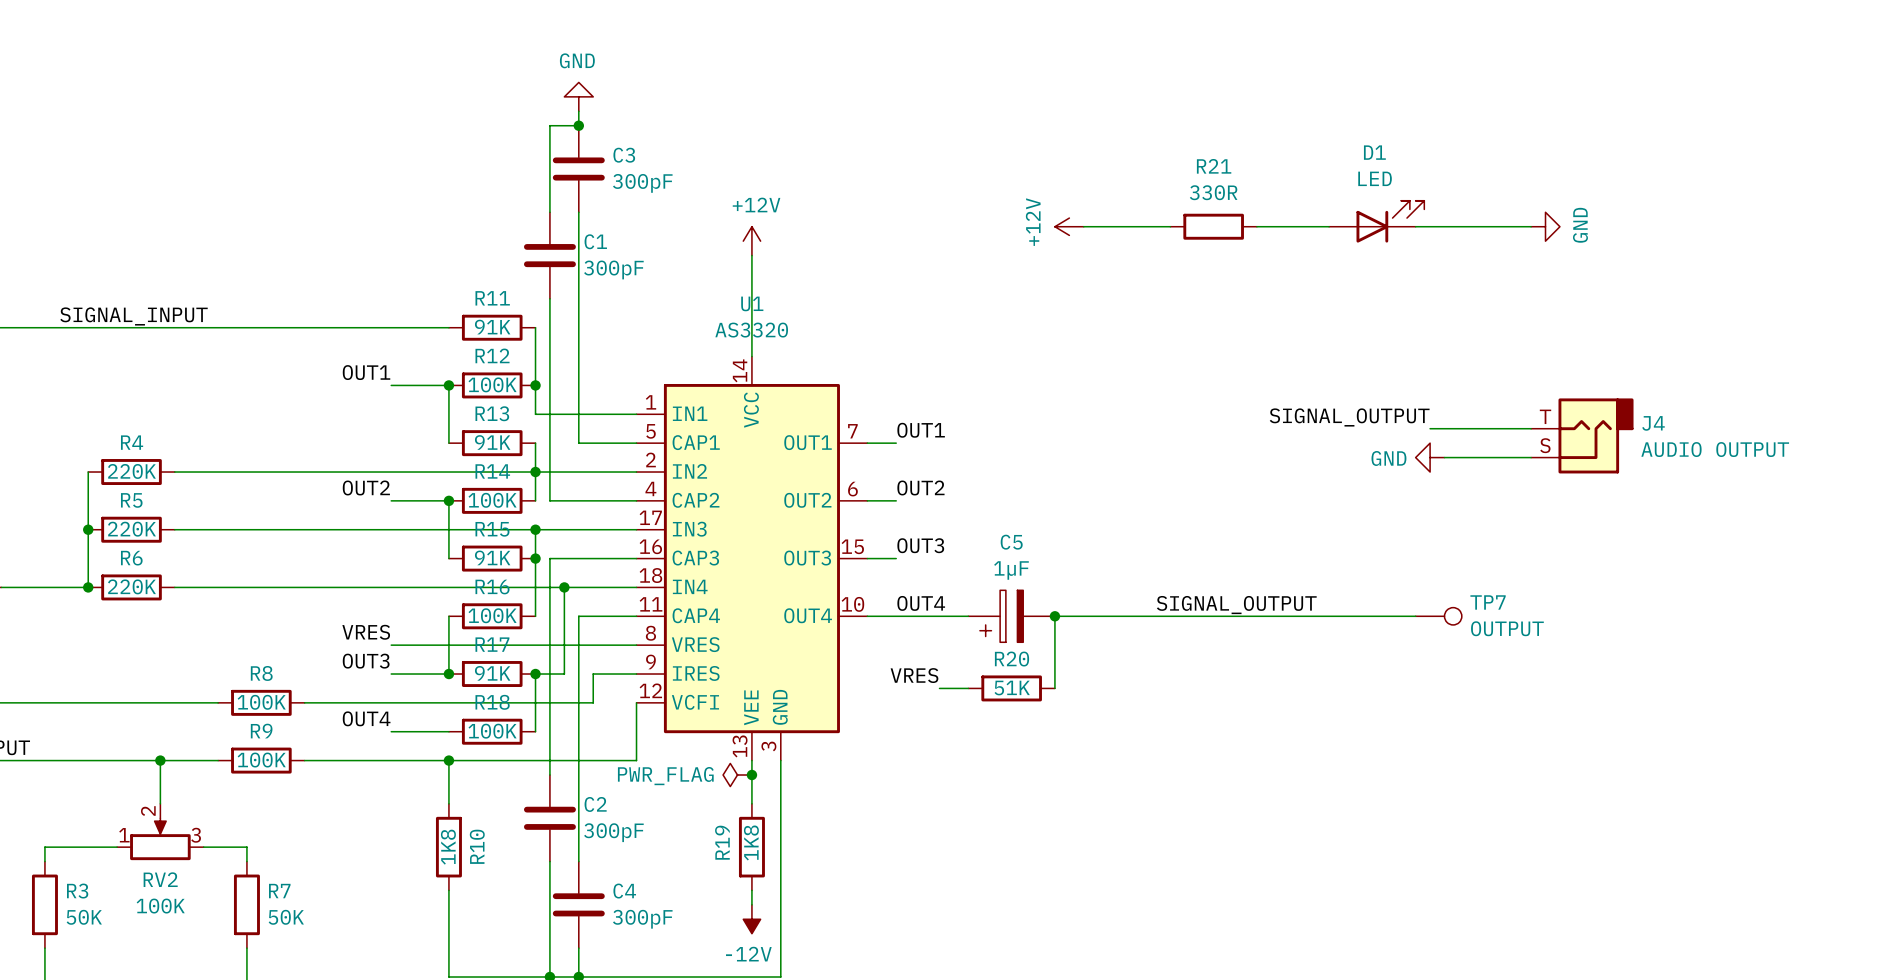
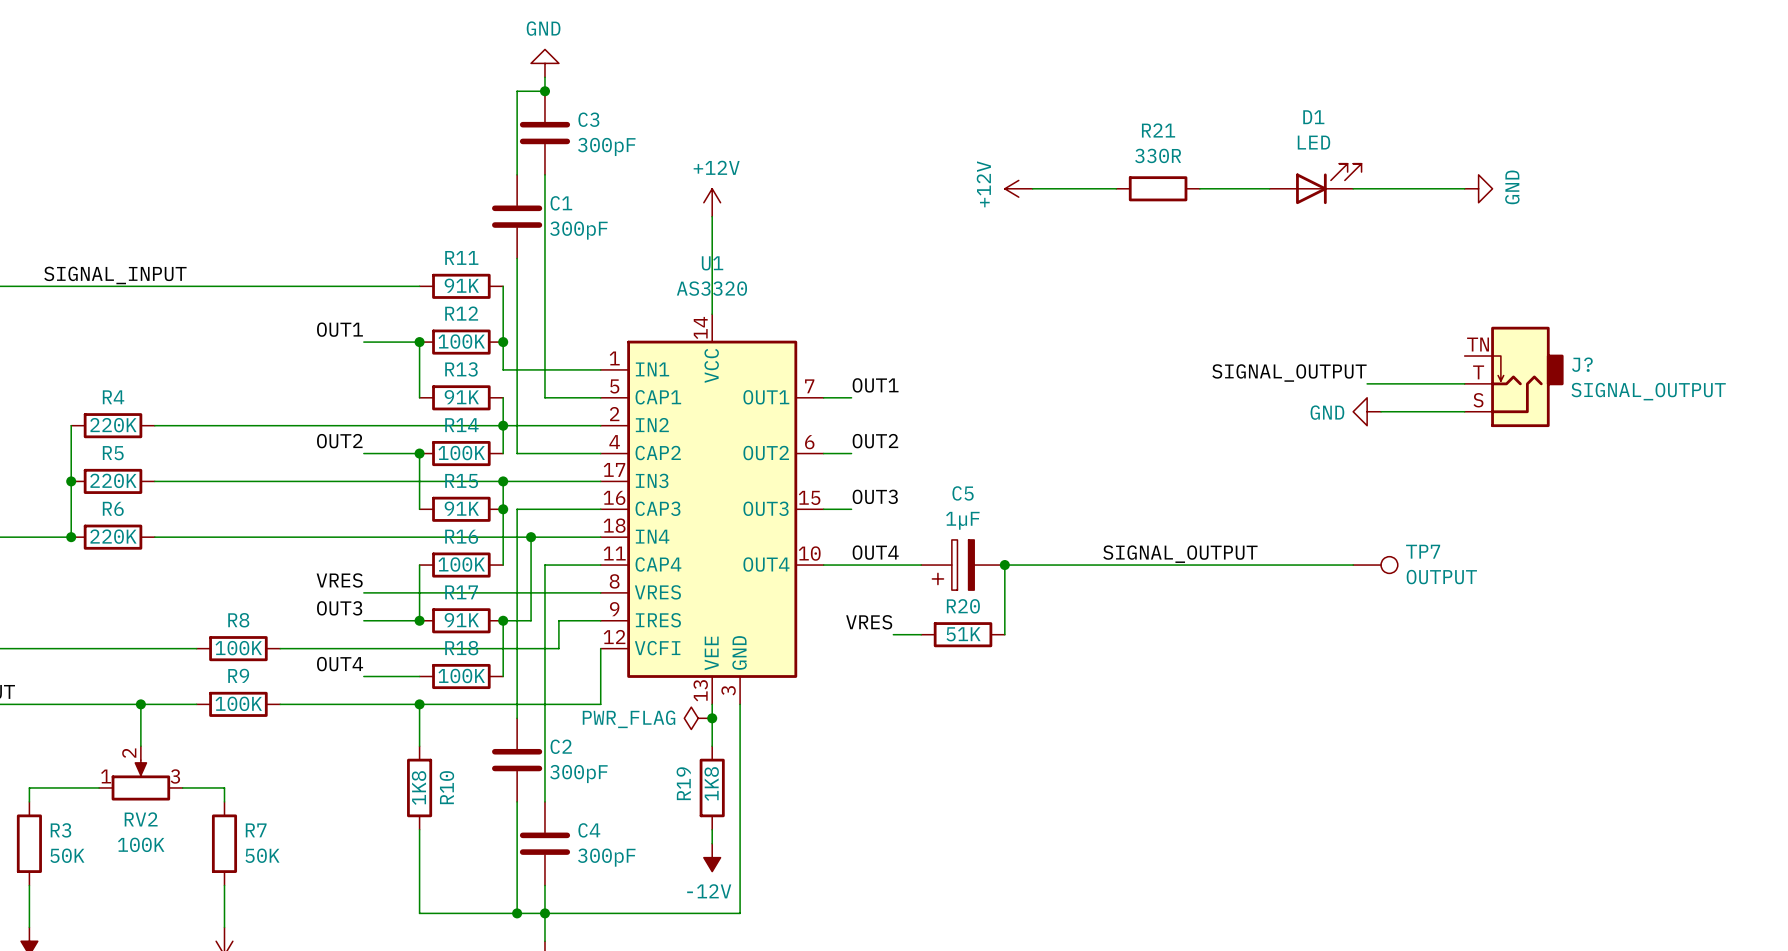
J?: none -> SIGNAL_OUTPUT (1514, 376)
J4: AUDIO OUTPUT (1582, 435) -> none

